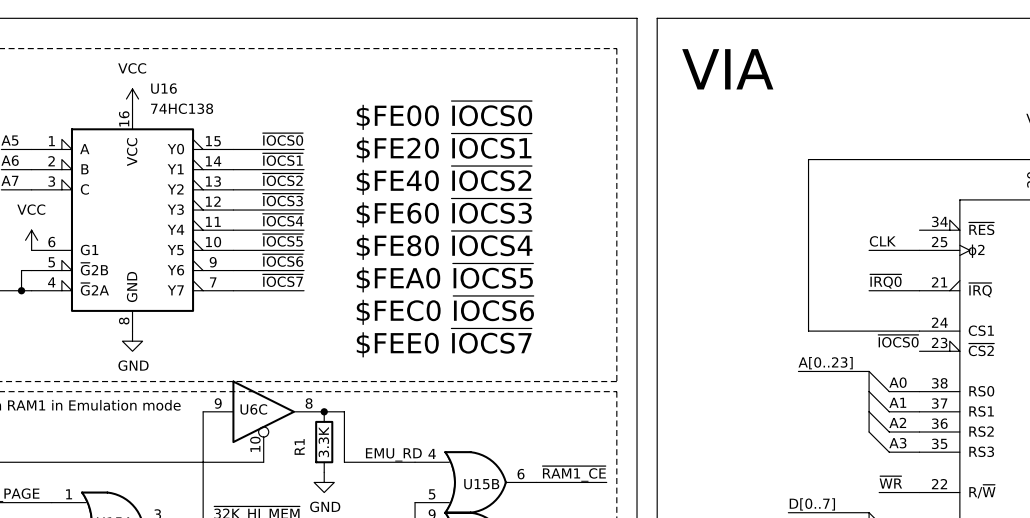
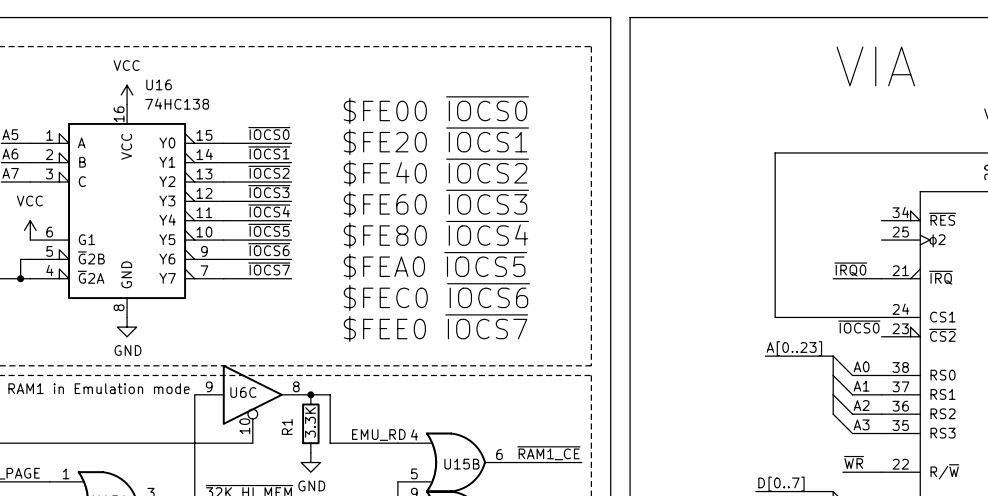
text position: VIA (727, 69) -> VIA (875, 66)
label: CLK (882, 241) -> none
wire: (869, 250) (919, 250) -> none

